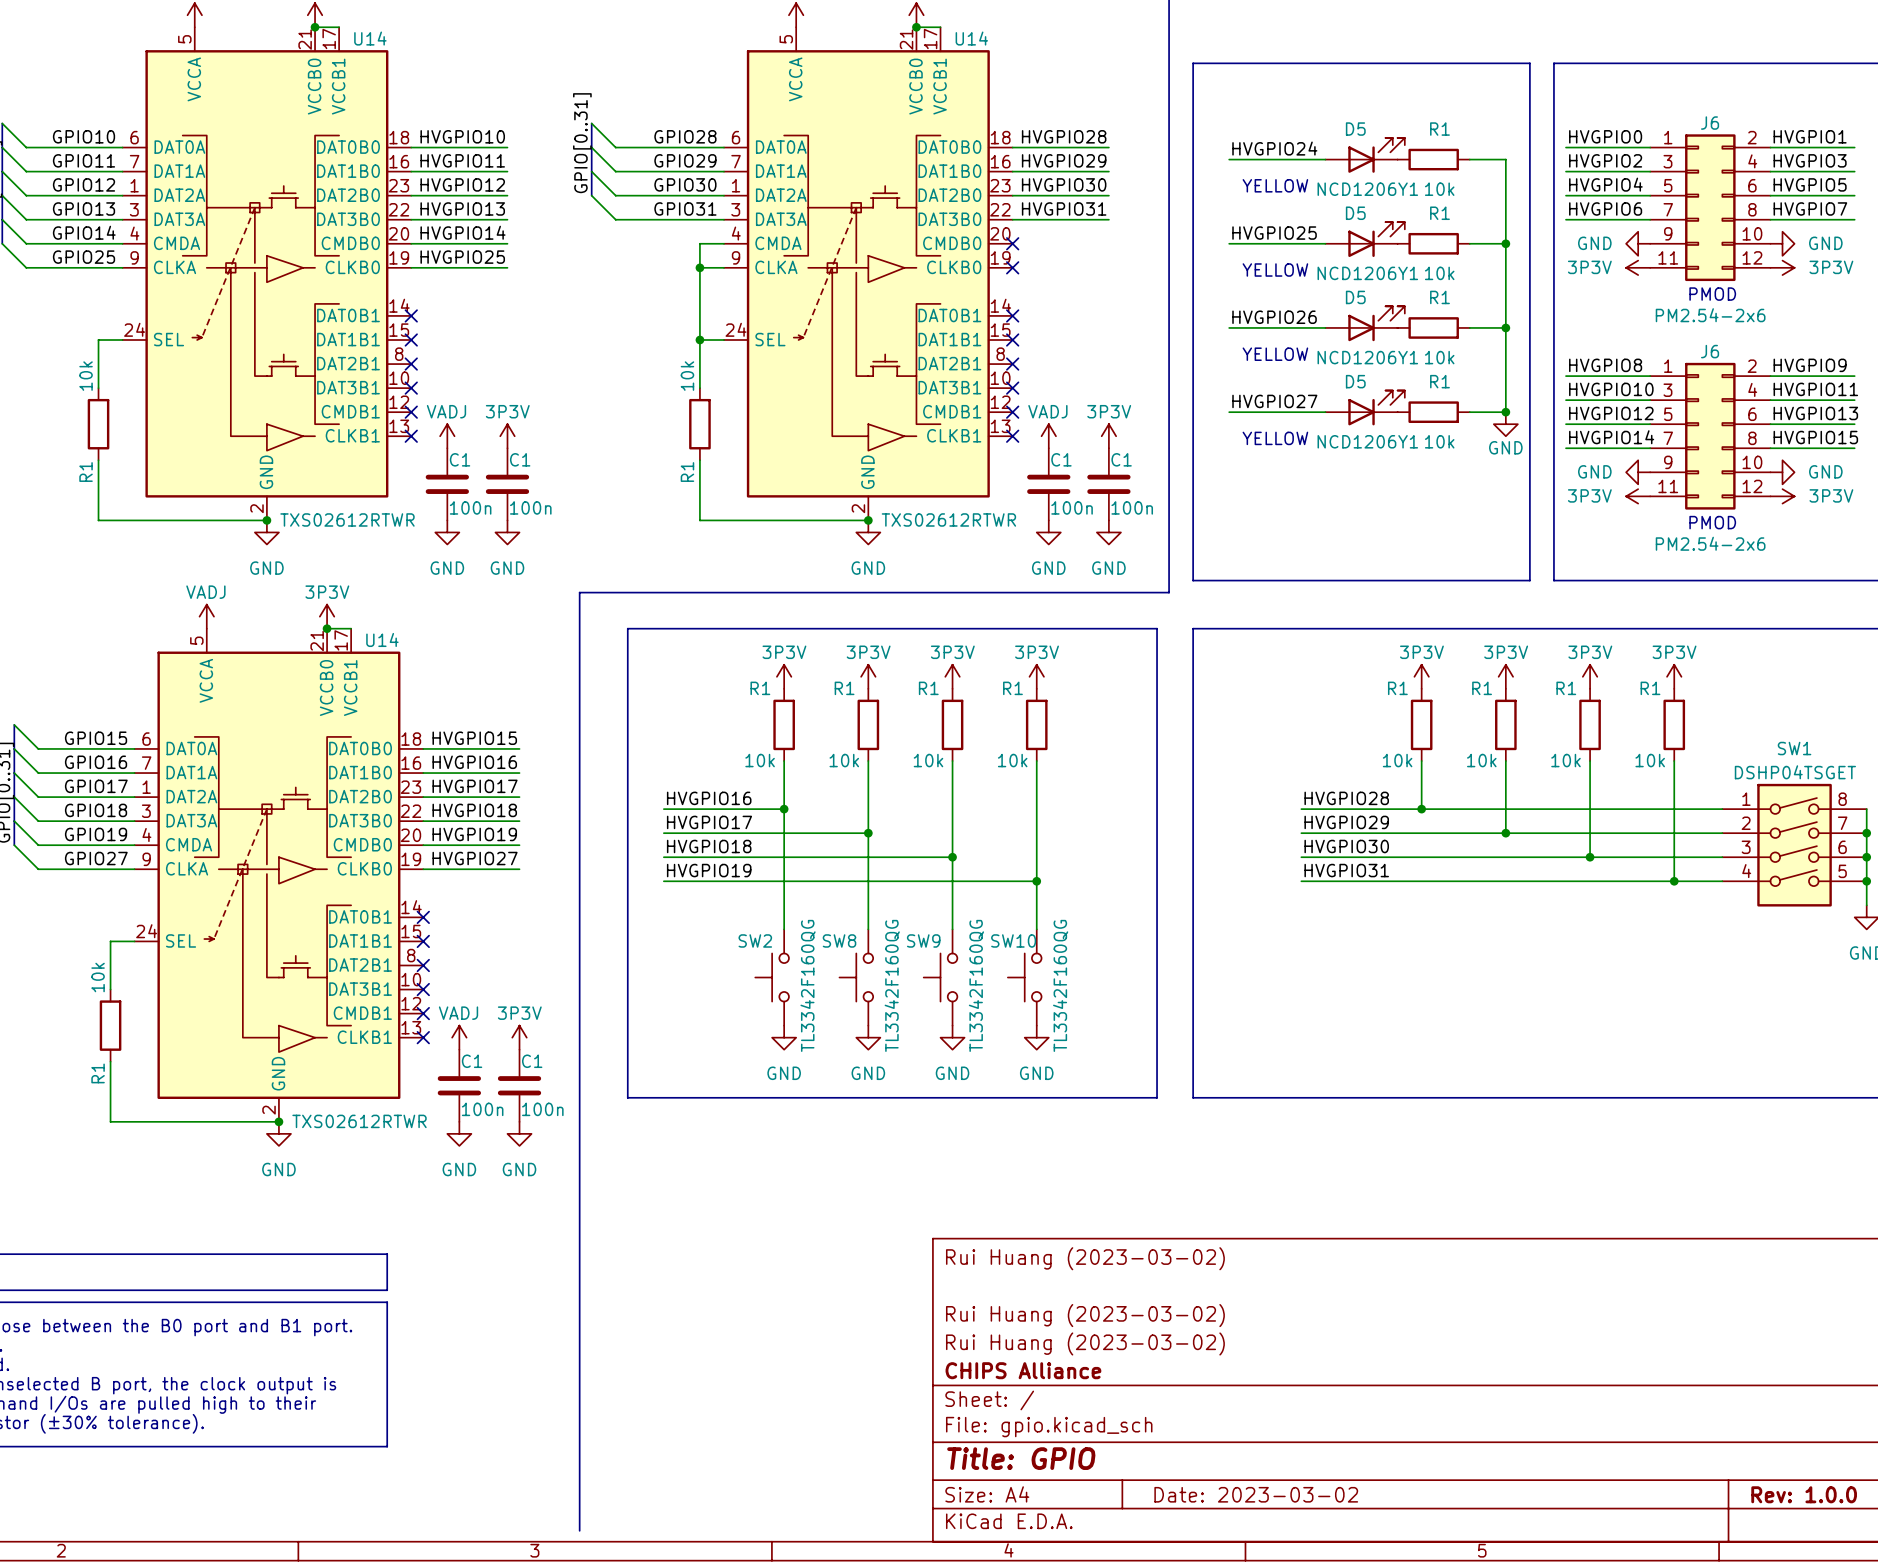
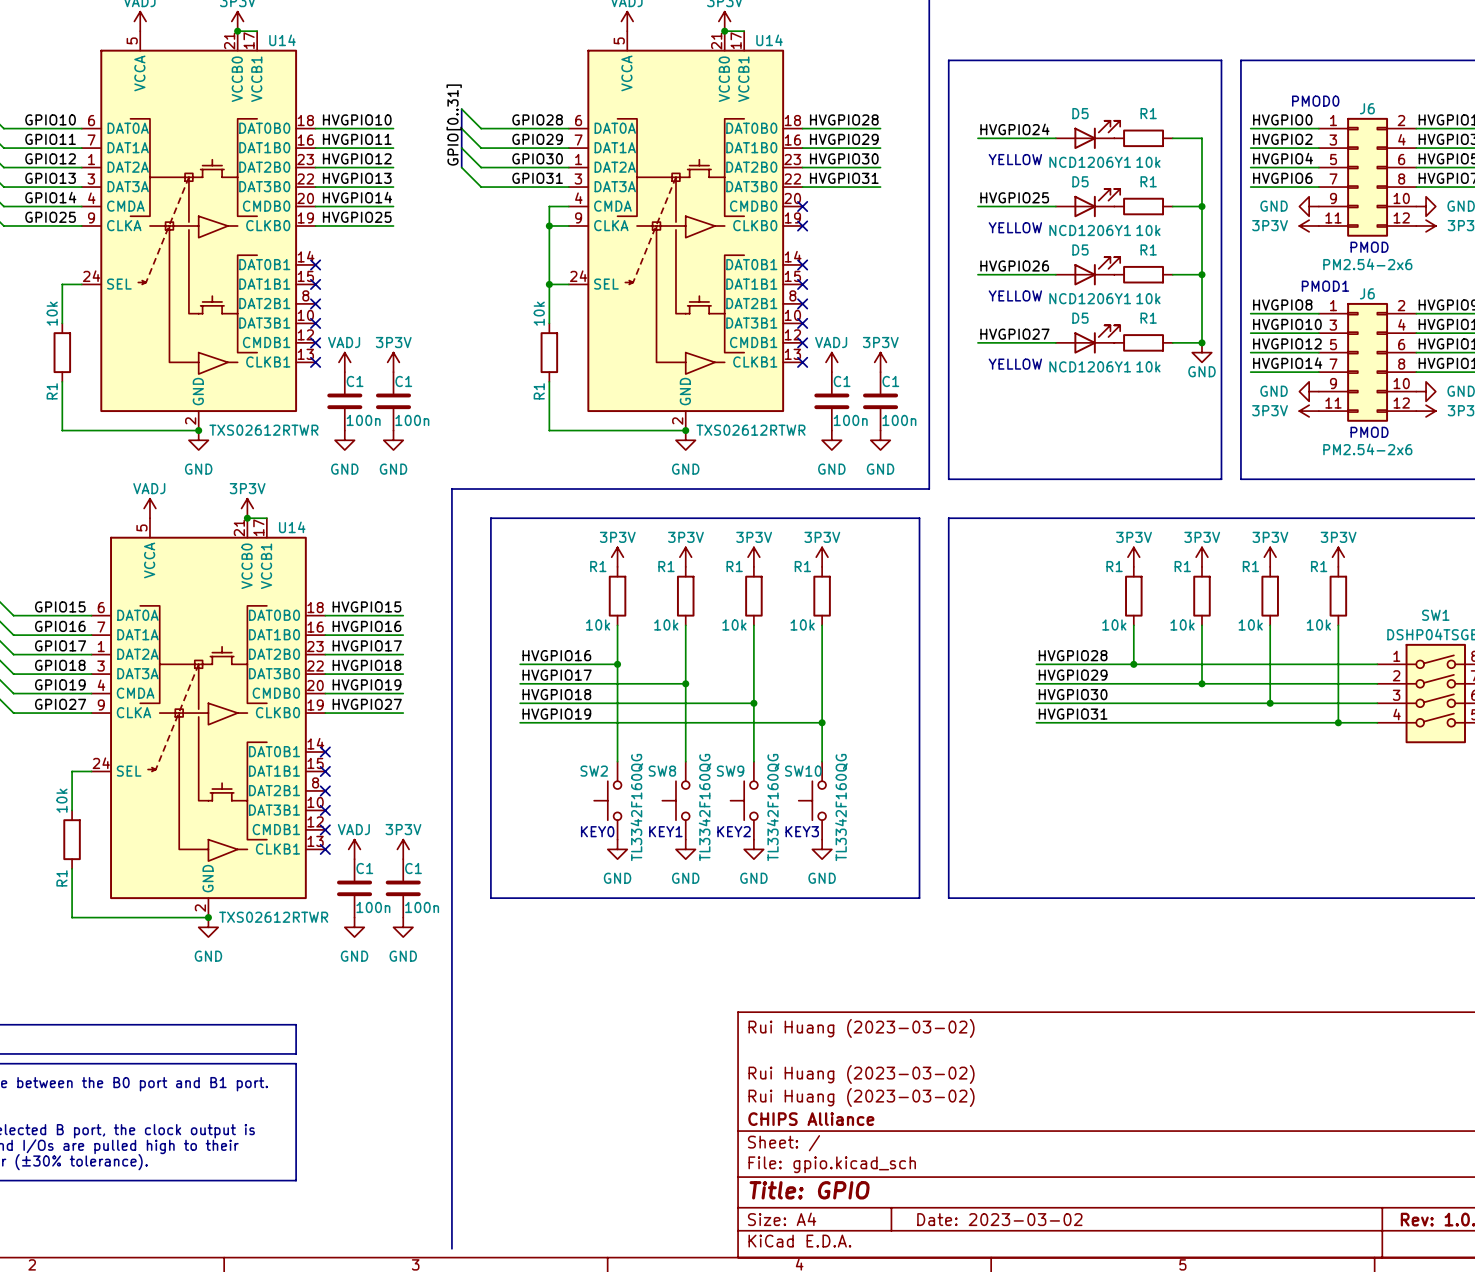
text: none -> PMOD0 (1315, 101)
text: none -> PMOD1 (1325, 286)
text: none -> KEY0 (597, 831)
text: none -> KEY1 (665, 831)
text: none -> KEY2 (734, 831)
text: none -> KEY3 (802, 831)

